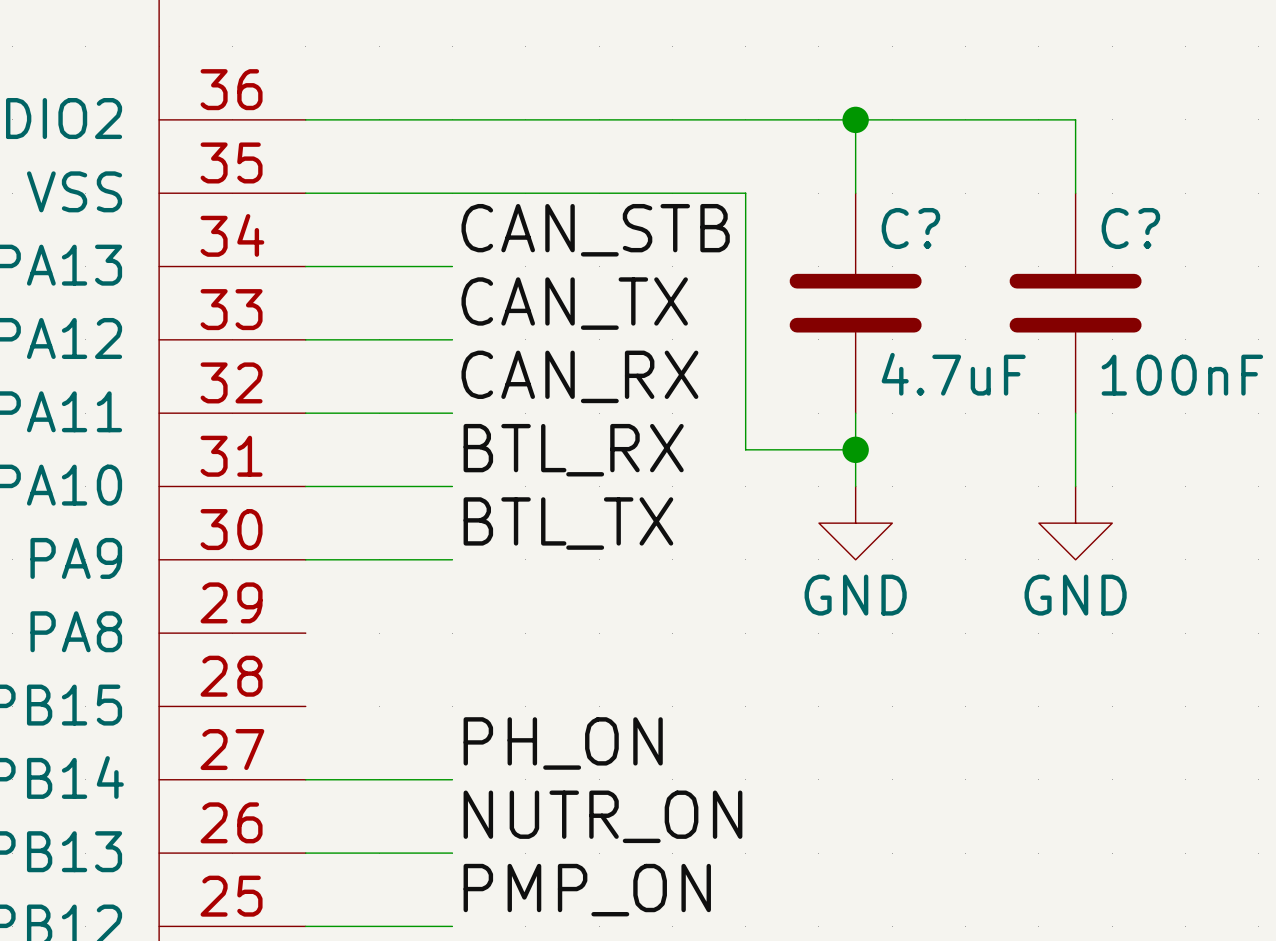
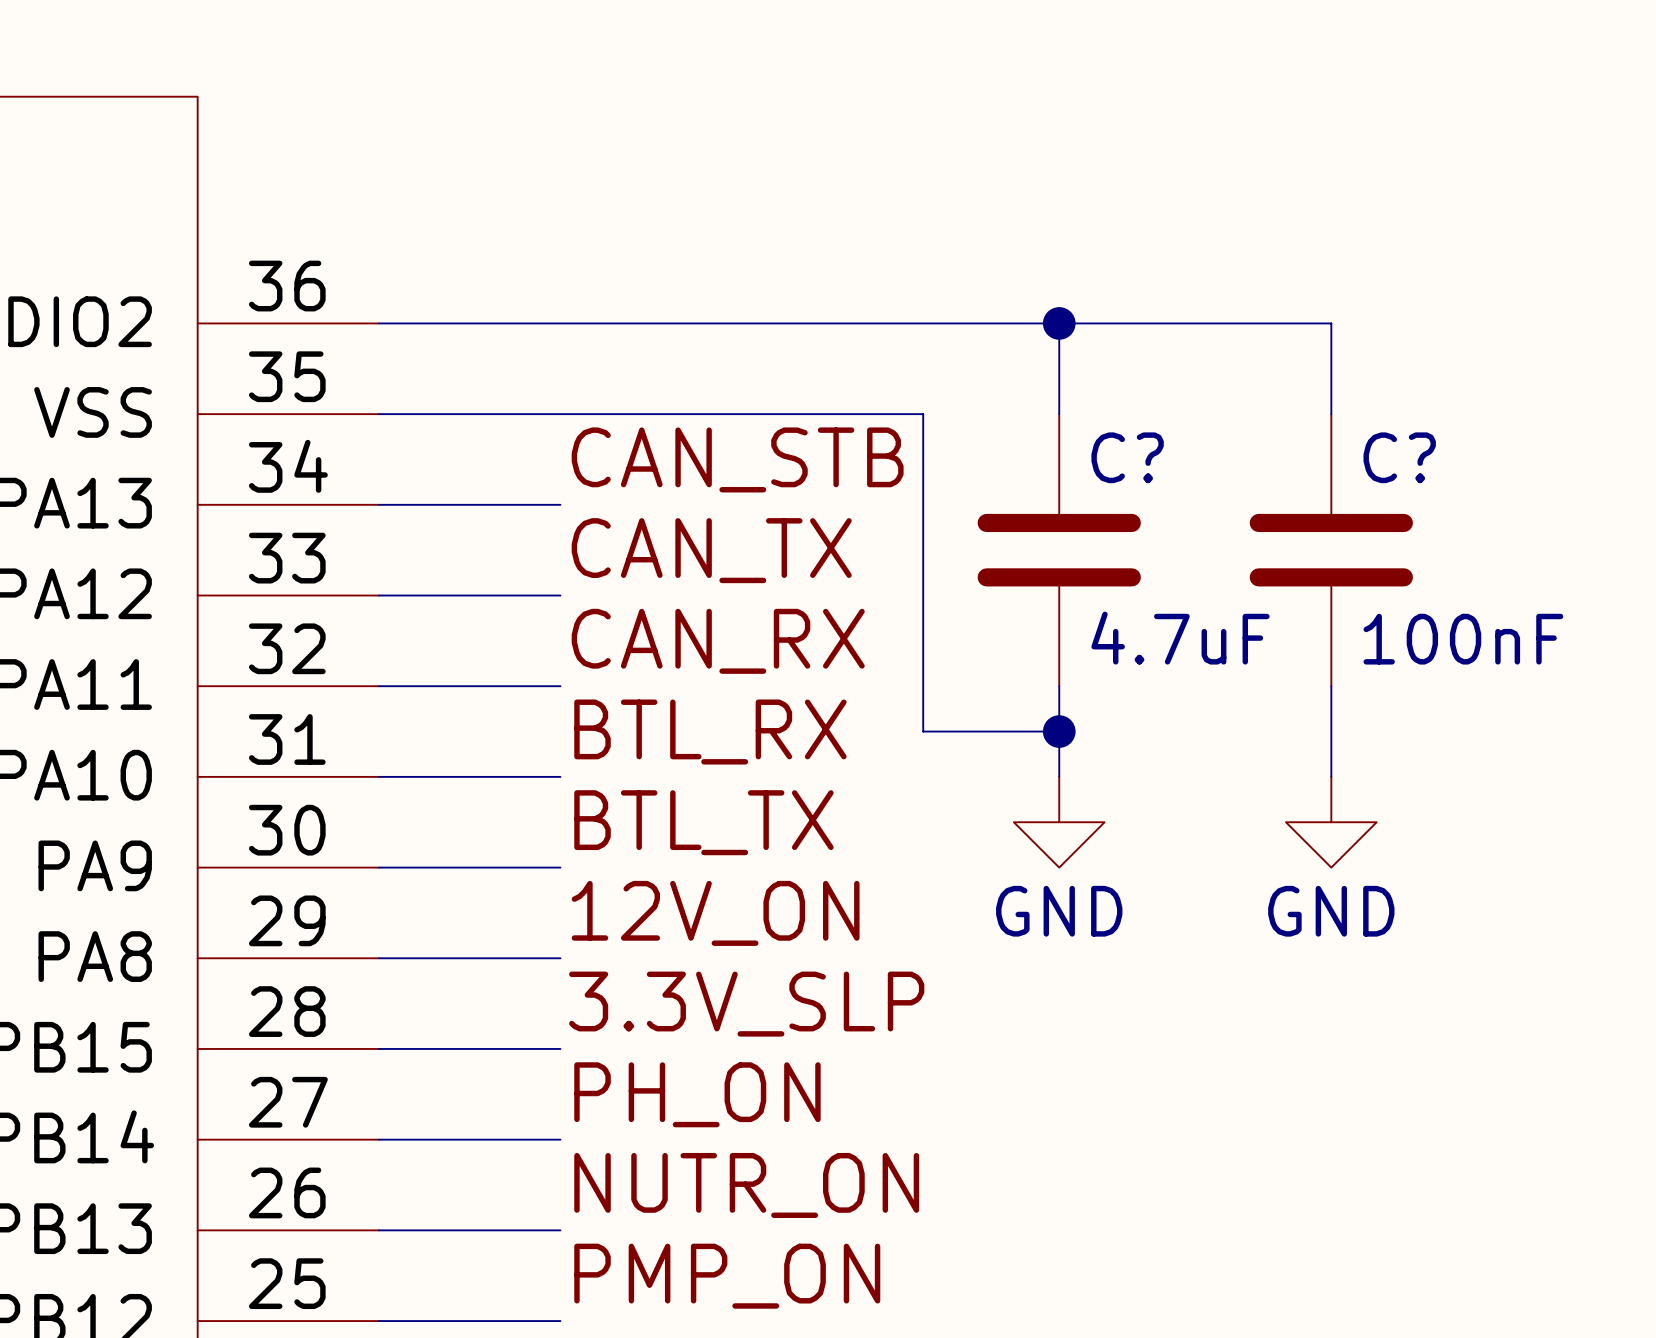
label: none -> 12V_ON (715, 913)
wire: none -> (379, 958) (560, 958)
label: none -> 3.3V_SLP (746, 1004)
wire: none -> (379, 1048) (560, 1048)

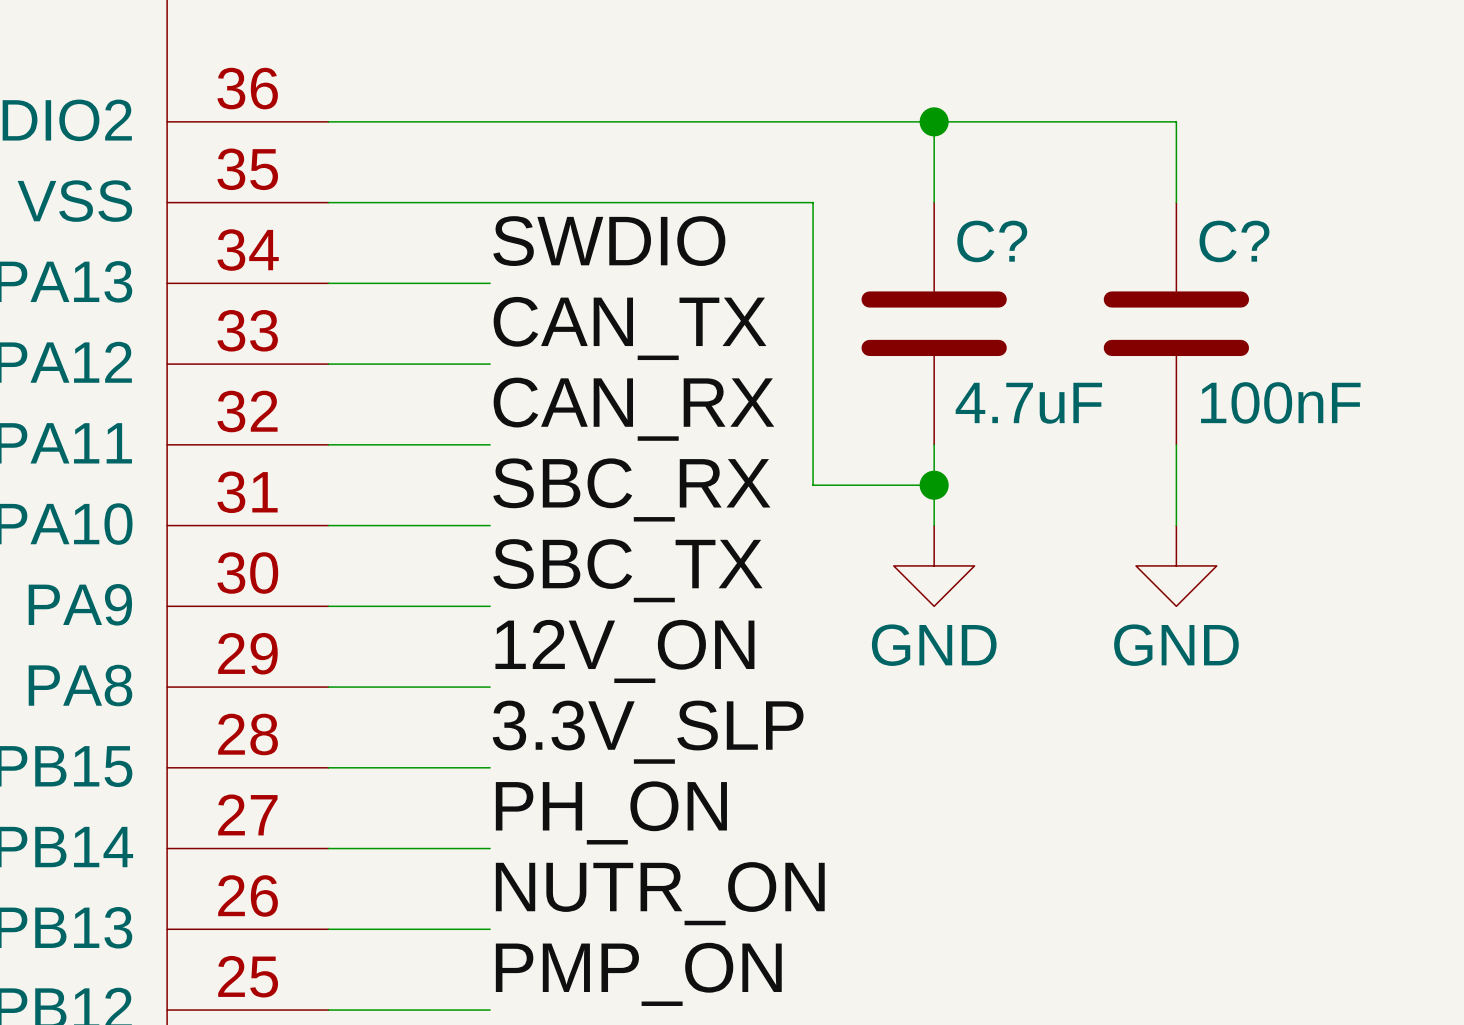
label: CAN_STB (737, 459) -> SWDIO (609, 241)
label: BTL_RX (710, 732) -> SBC_RX (631, 489)
label: BTL_TX (703, 822) -> SBC_TX (627, 570)

